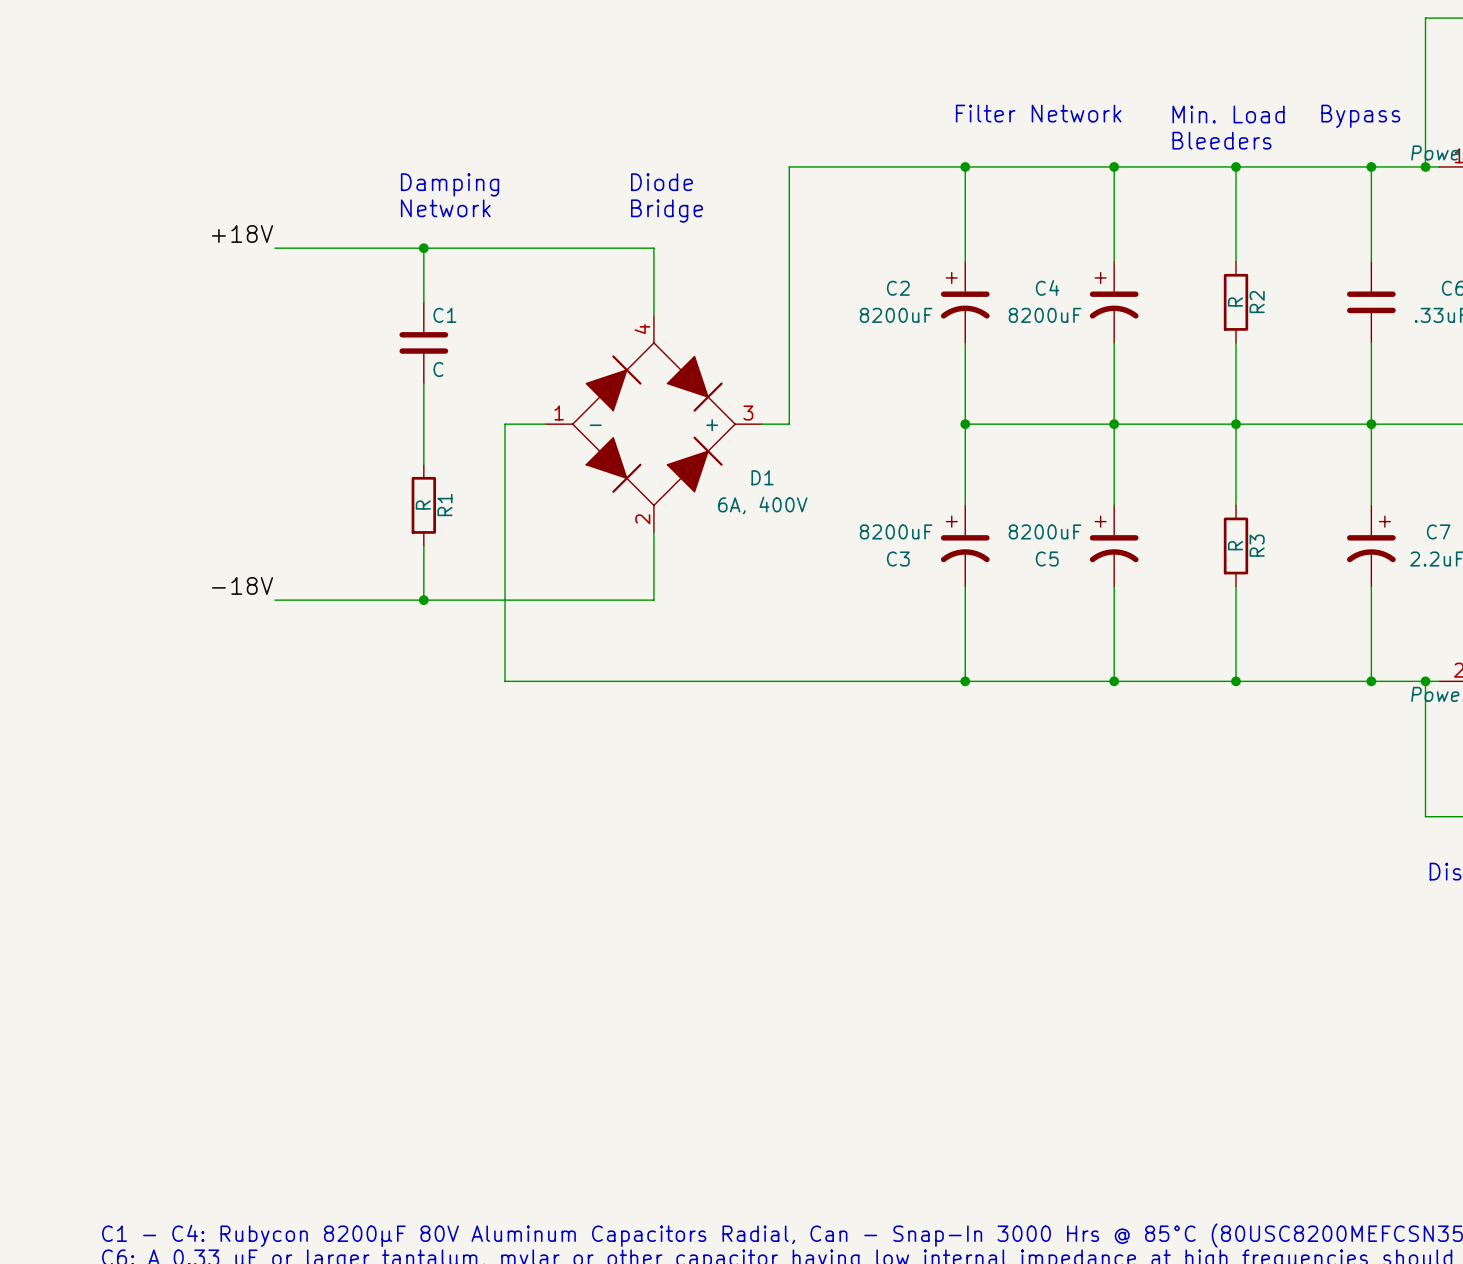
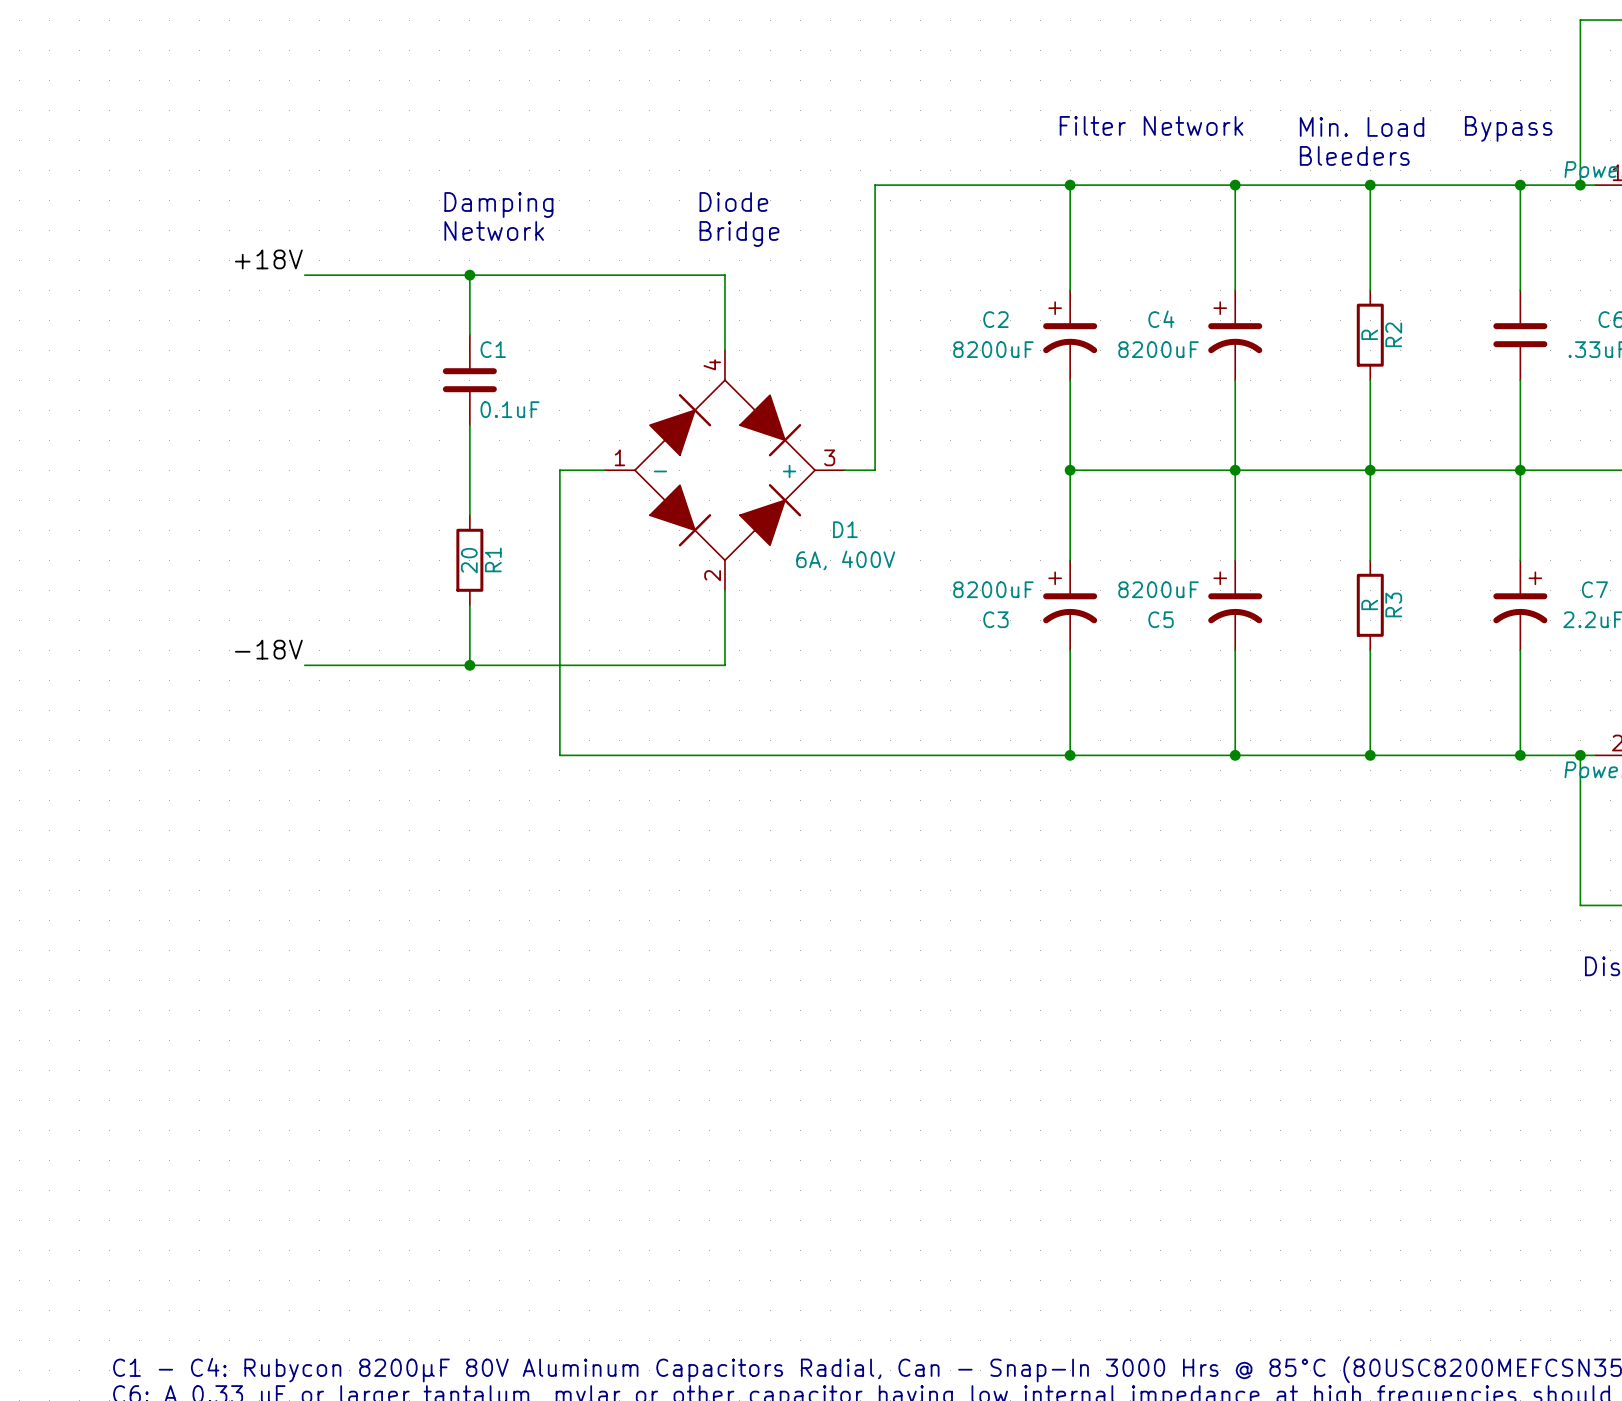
C1 value: C (438, 369) -> 0.1uF (509, 409)
R1 value: R (423, 505) -> 20 (469, 560)

